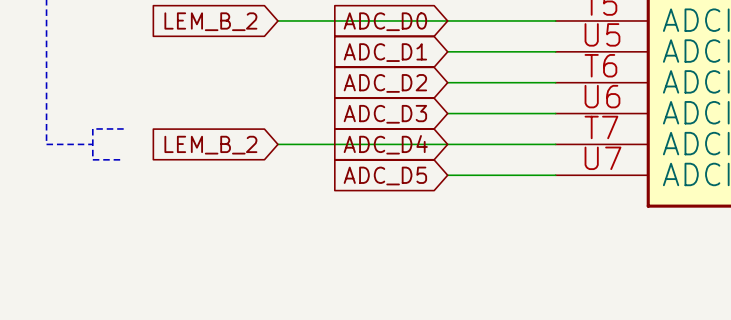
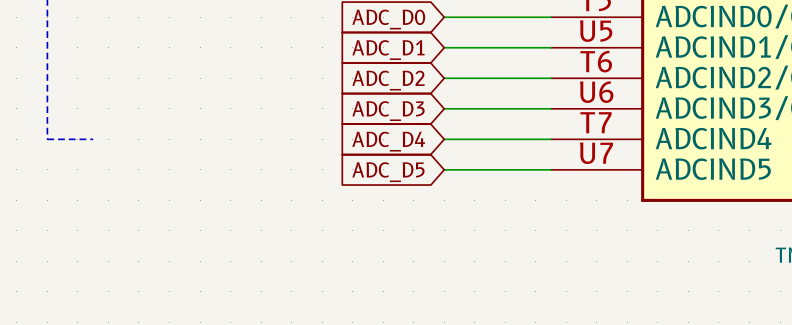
wire: (277, 20) (447, 20) -> none
global label: LEM_B_2 (210, 21) -> none
line: (123, 128) (92, 128) (92, 159) (123, 159) -> none
wire: (277, 144) (447, 144) -> none
global label: LEM_B_2 (210, 145) -> none

